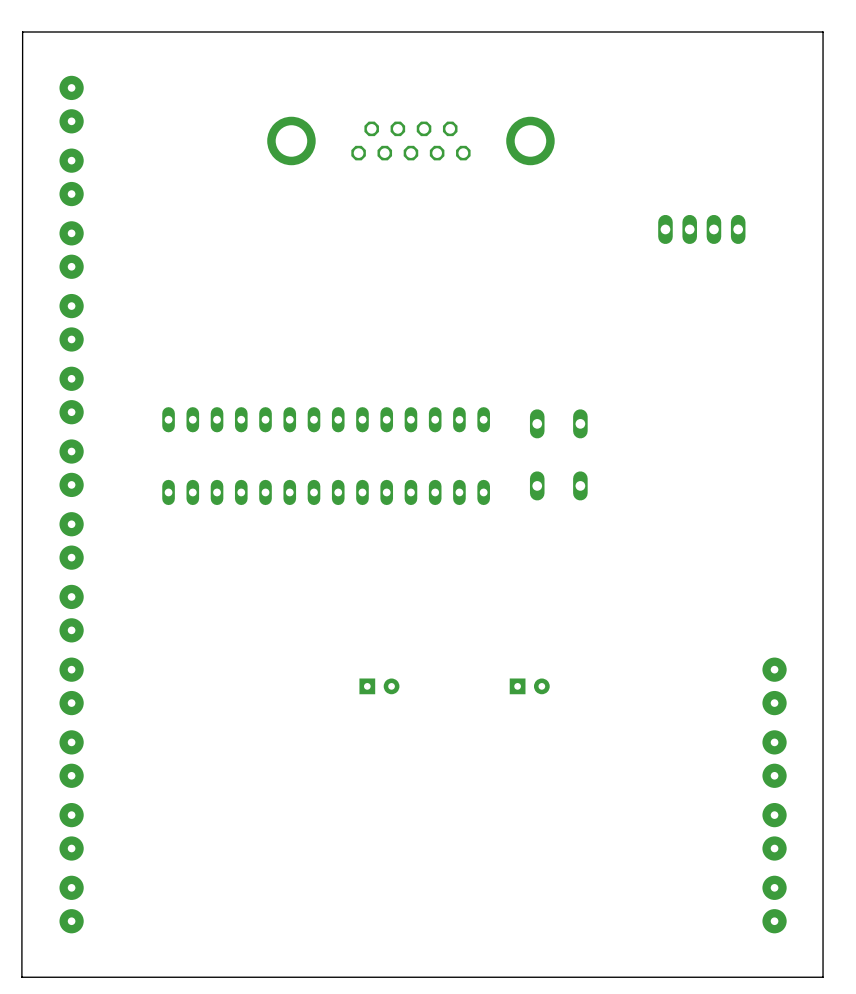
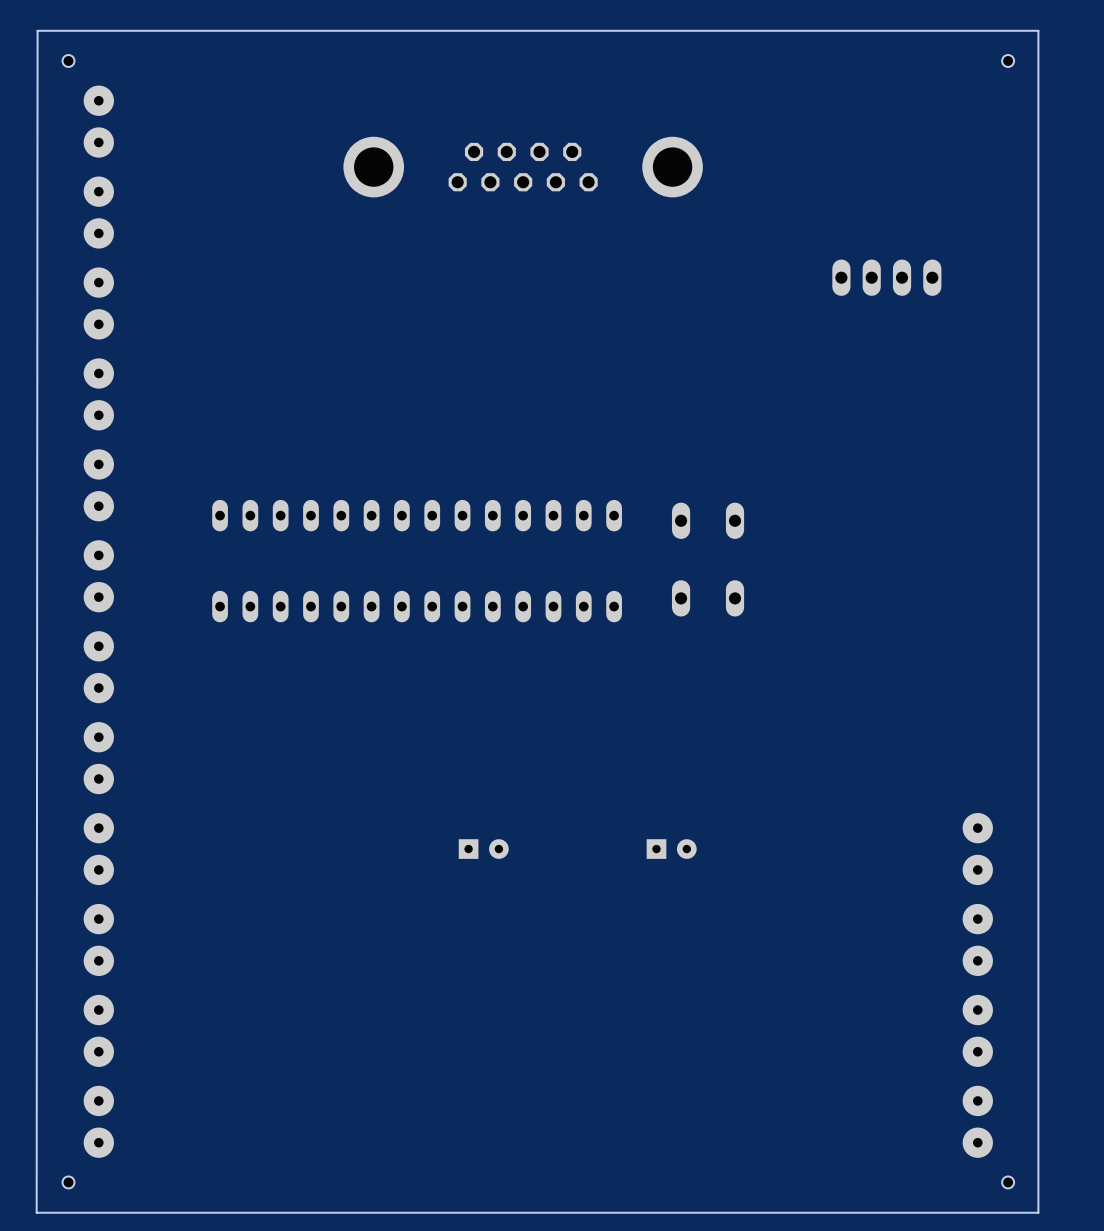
part: none -> (68, 60)
part: none -> (1008, 60)
part: none -> (68, 1182)
part: none -> (1008, 1182)

